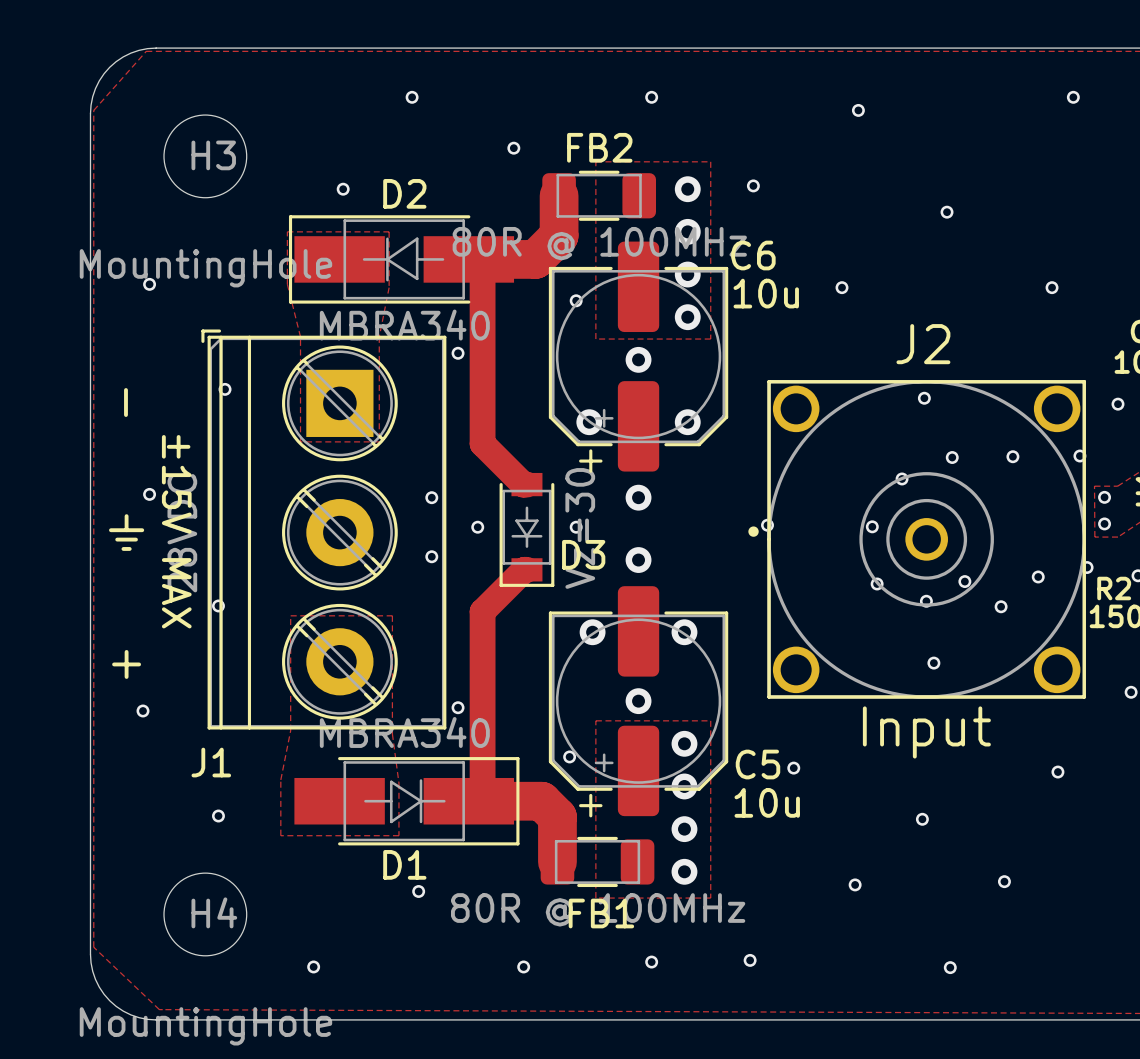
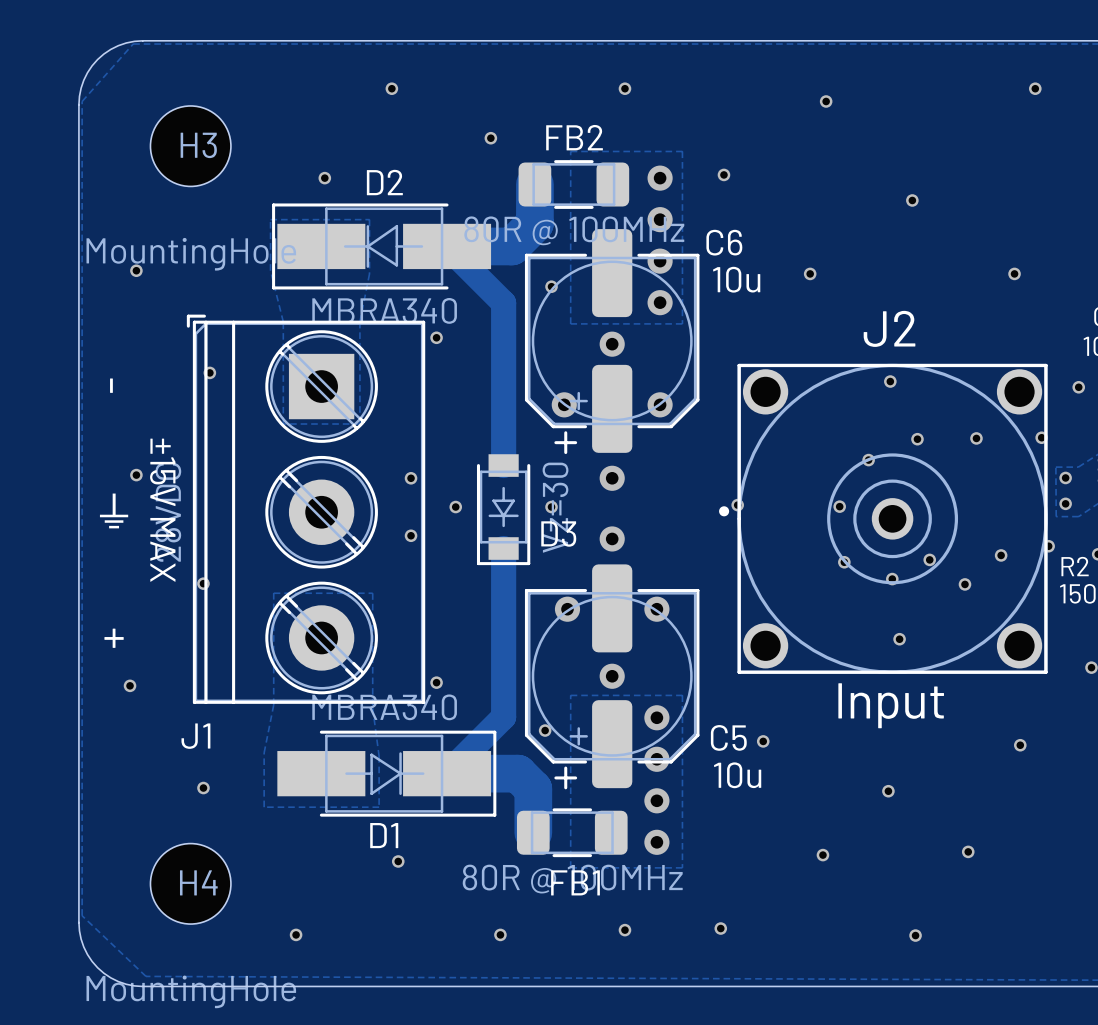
track: (482, 273) (482, 443) (523, 484) (526, 484) -> (460, 259) (503, 303) (503, 465)
track: (526, 569) (524, 569) (482, 611) (482, 787) -> (503, 548) (503, 717) (460, 760)

